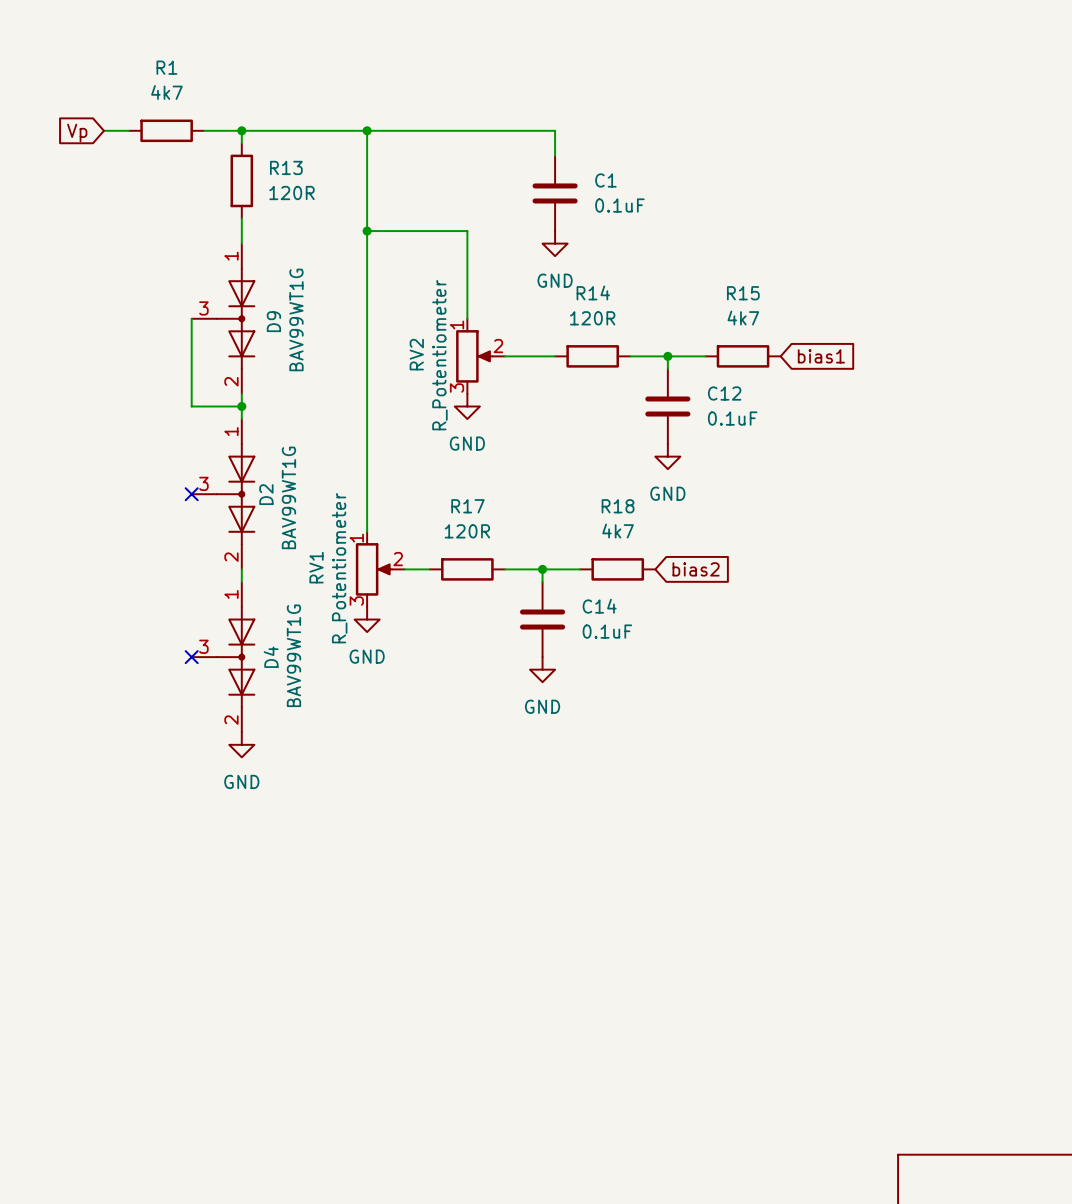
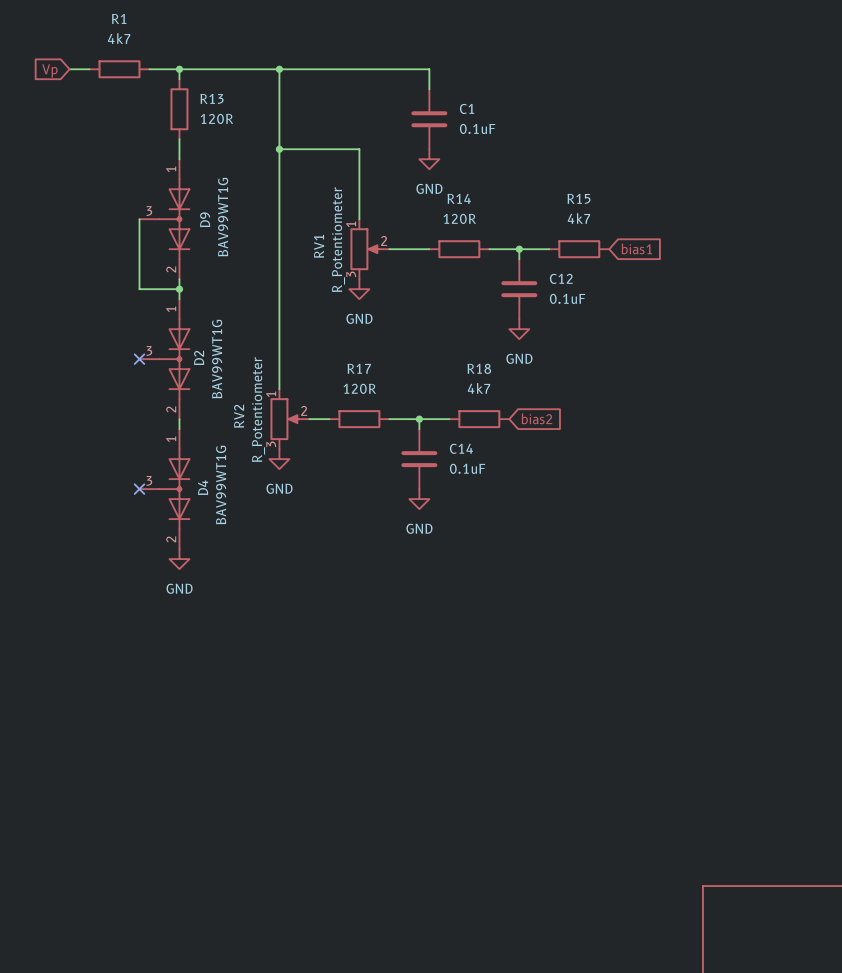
RV2 name: RV2 (416, 354) -> RV1 (319, 246)
RV1 name: RV1 (316, 567) -> RV2 (239, 416)

